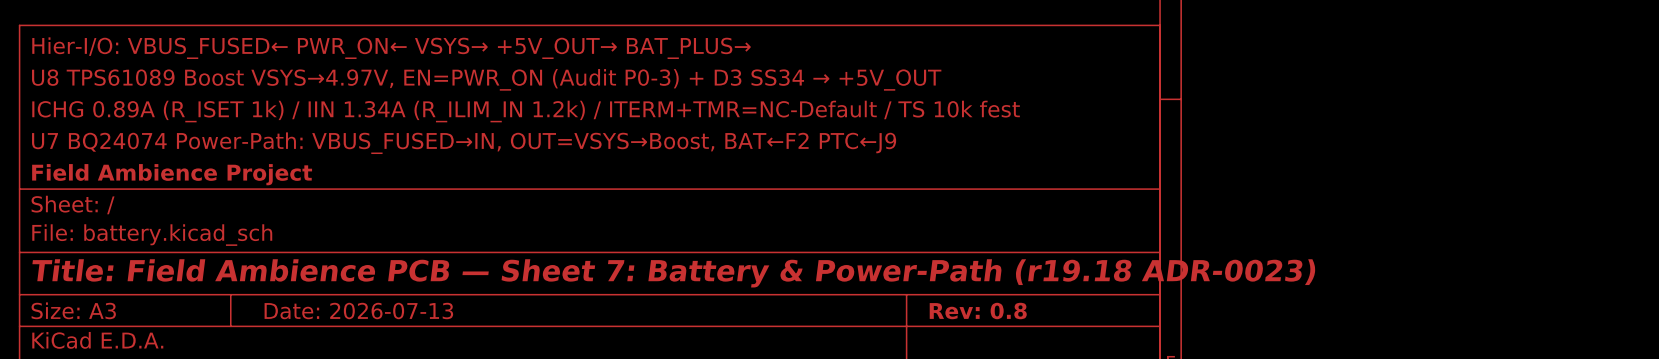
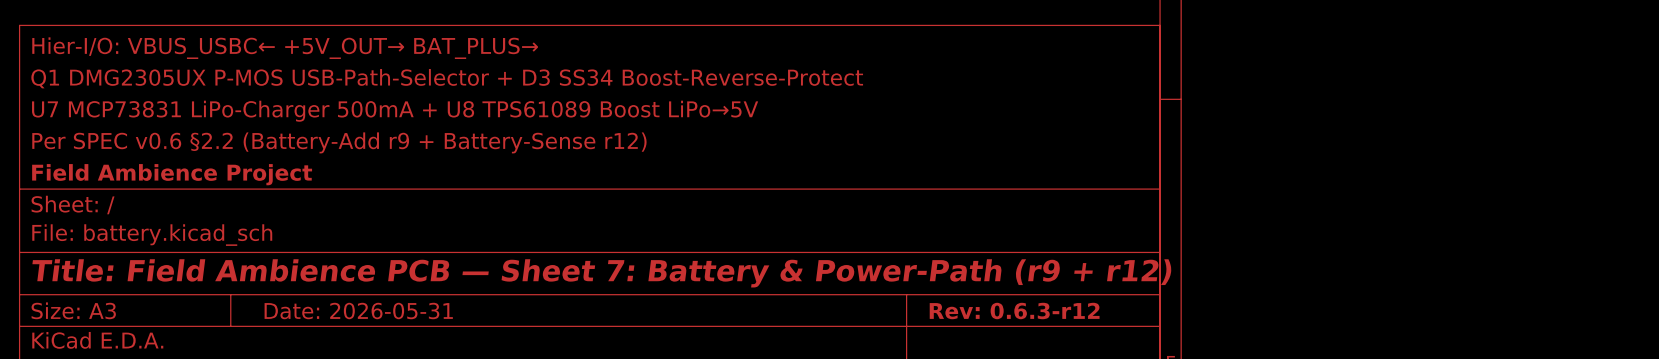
title block: Hier-I/O: VBUS_FUSED← PWR_ON← VSYS→ +5V_OUT→ BAT_PLUS→ (391, 48) -> Hier-I/O: VBUS_USBC← +5V_OUT→ BAT_PLUS→ (285, 48)
title block: U8 TPS61089 Boost VSYS→4.97V, EN=PWR_ON (Audit P0-3) + D3 SS34 → +5V_OUT (486, 79) -> Q1 DMG2305UX P-MOS USB-Path-Selector + D3 SS34 Boost-Reverse-Protect (447, 78)
title block: ICHG 0.89A (R_ISET 1k) / IIN 1.34A (R_ILIM_IN 1.2k) / ITERM+TMR=NC-Default / TS 10k fest (526, 111) -> U7 MCP73831 LiPo-Charger 500mA + U8 TPS61089 Boost LiPo→5V (395, 111)
title block: U7 BQ24074 Power-Path: VBUS_FUSED→IN, OUT=VSYS→Boost, BAT←F2 PTC←J9 (464, 143) -> Per SPEC v0.6 §2.2 (Battery-Add r9 + Battery-Sense r12) (339, 142)
title block: Title: Field Ambience PCB — Sheet 7: Battery & Power-Path (r19.18 ADR-0023) (673, 273) -> Title: Field Ambience PCB — Sheet 7: Battery & Power-Path (r9 + r12) (601, 273)
title block: Date: 2026-07-13 (358, 311) -> Date: 2026-05-31 (358, 311)
title block: Rev: 0.8 (978, 311) -> Rev: 0.6.3-r12 (1014, 311)

